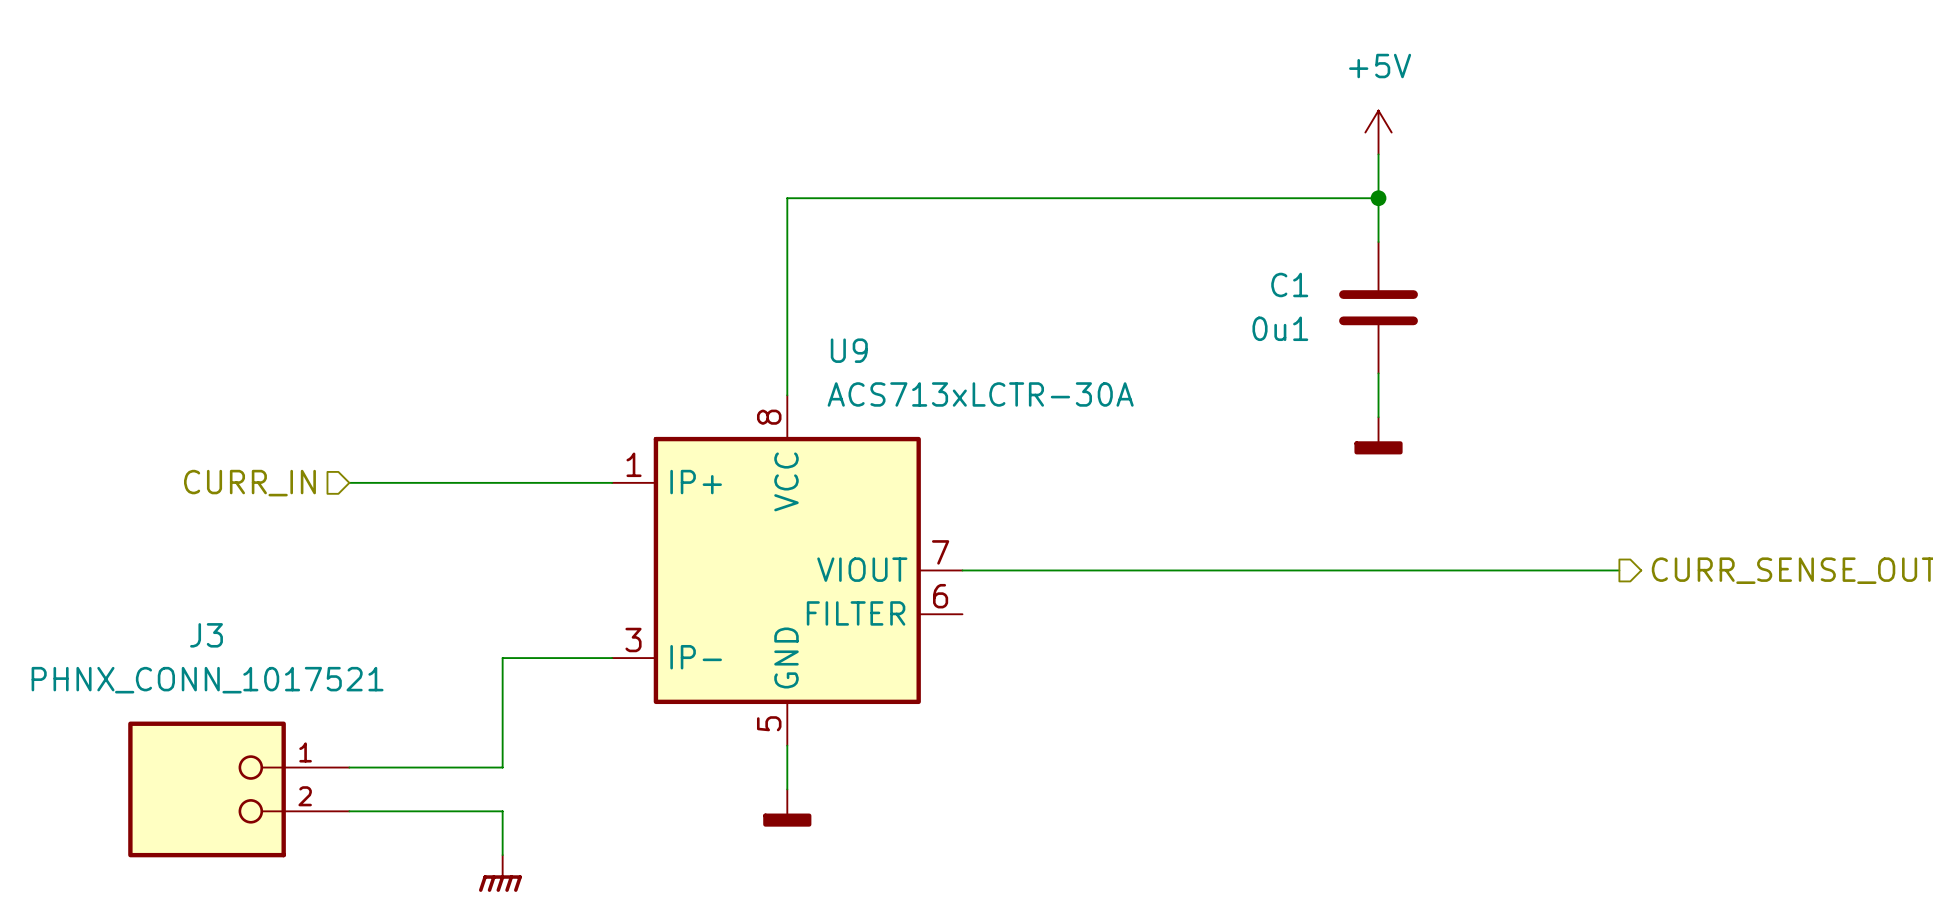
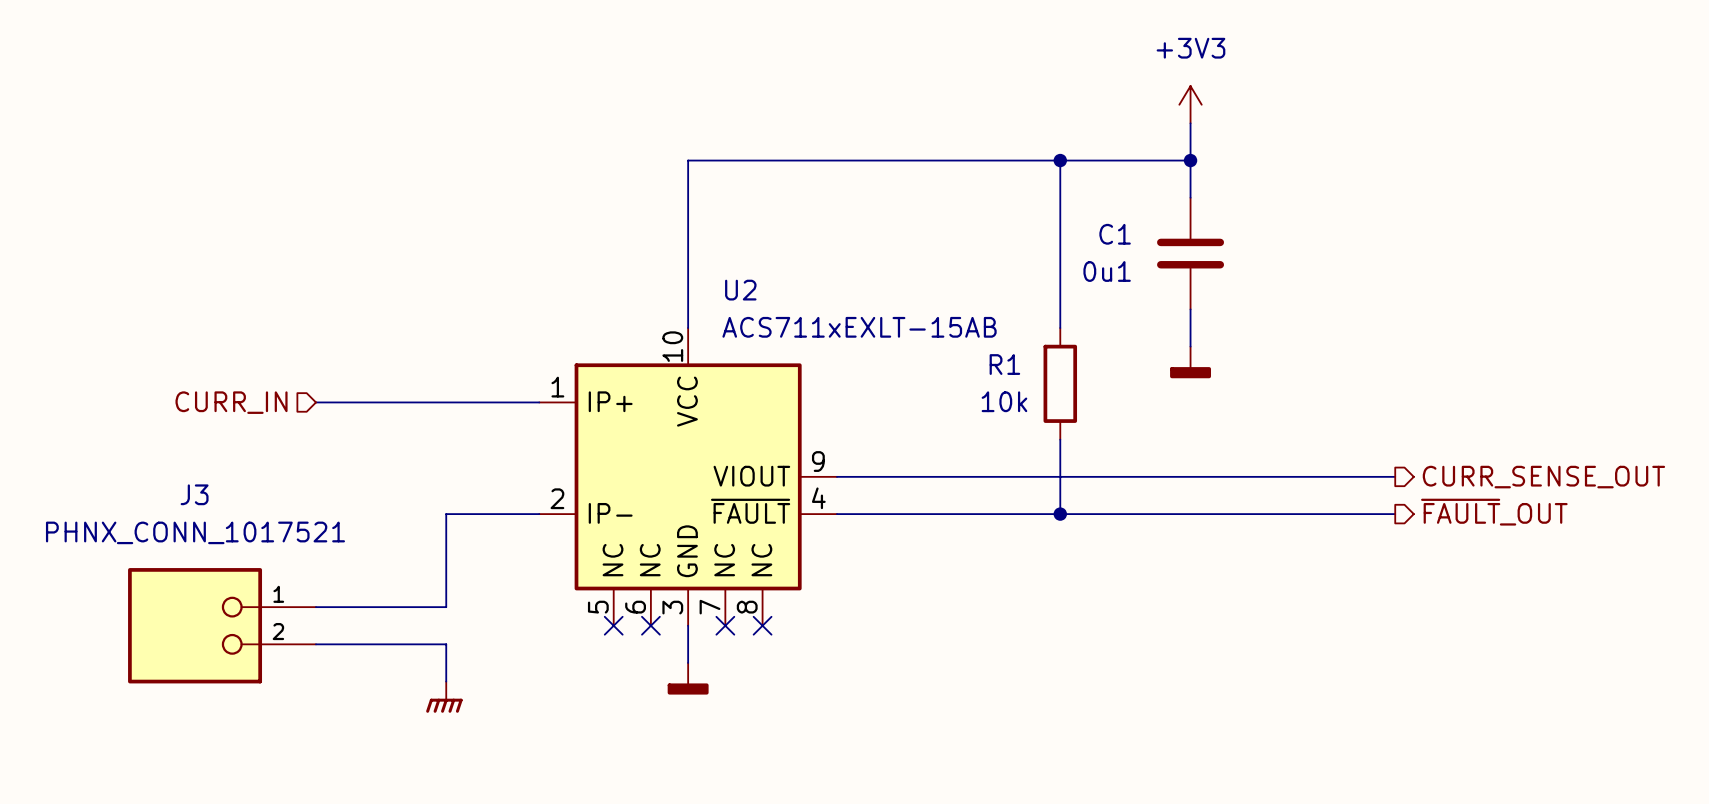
power symbol: +5V (1378, 132) -> +3V3 (1190, 104)
wire: none -> (1060, 160) (1060, 328)
junction: none -> (1060, 160)
R1: none -> 10k (1060, 383)
wire: none -> (1060, 439) (1060, 514)
U9: ACS713xLCTR-30A (787, 570) -> none
U2: none -> ACS711xEXLT-15AB (688, 476)
hierarchical label: none -> ~{FAULT}_OUT (1494, 512)
wire: none -> (836, 514) (1395, 514)
junction: none -> (1060, 514)
wire: (502, 658) (612, 658) -> (446, 551) (446, 514) (539, 514)
wire: none -> (315, 607) (446, 607)
wire: (502, 723) (502, 767) -> (446, 681) (446, 644)
no-connect mark: none -> (613, 625)
no-connect mark: none -> (650, 625)
no-connect mark: none -> (725, 625)
no-connect mark: none -> (762, 625)
J3 position: (238, 789) -> (222, 625)
wire: (349, 811) (502, 811) (502, 855) -> none
power symbol position: (500, 873) -> (444, 697)

